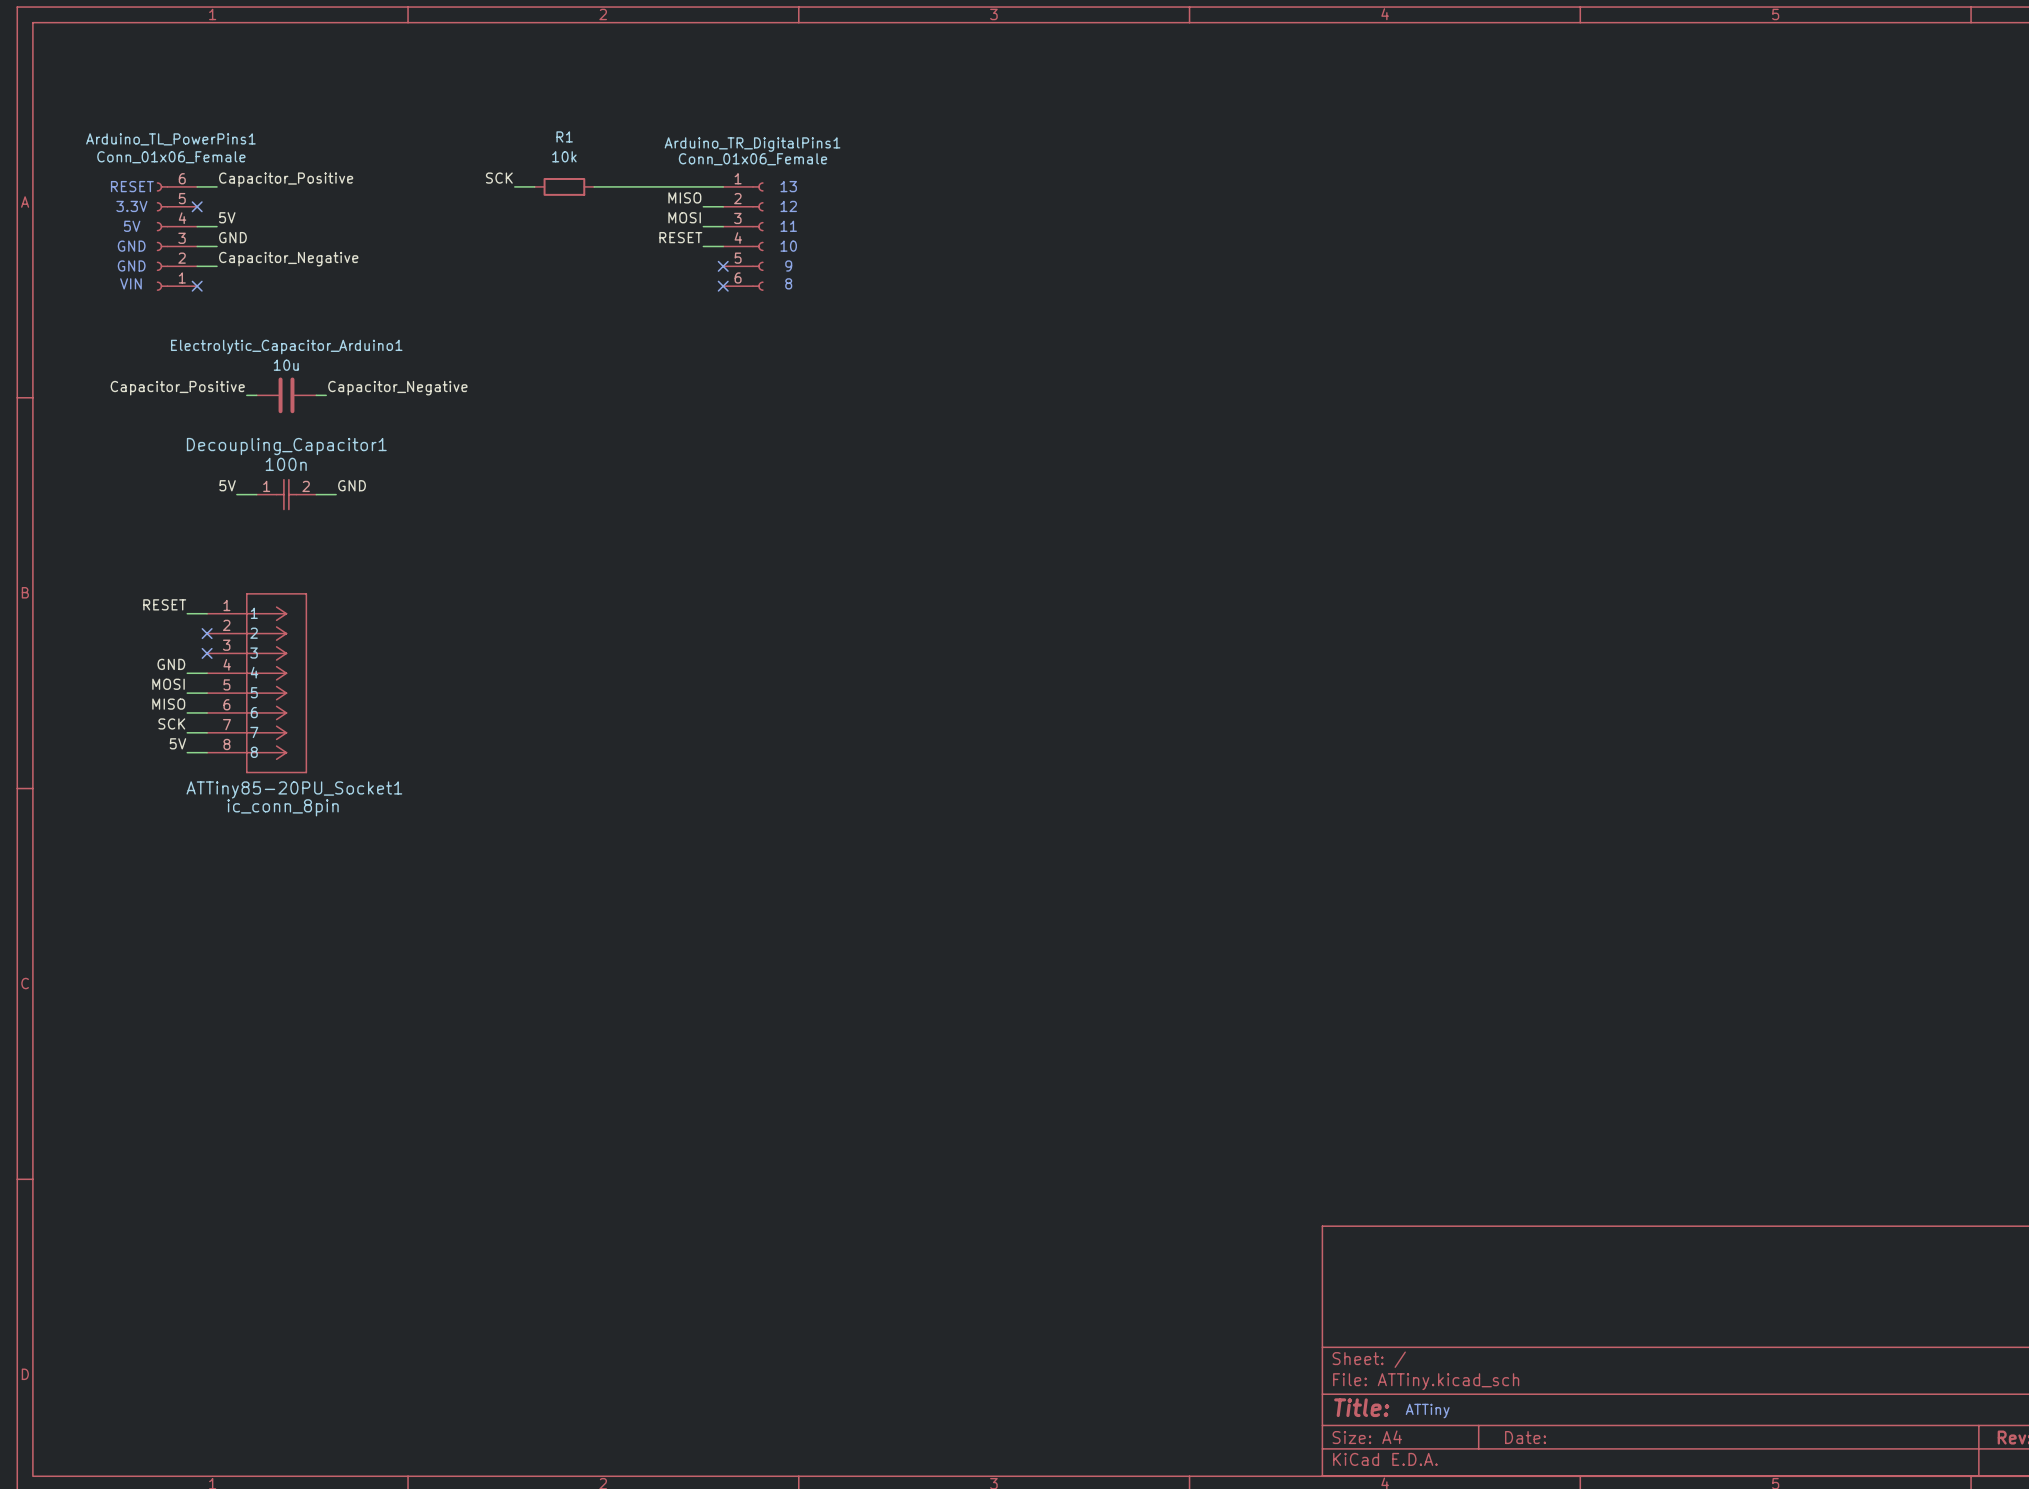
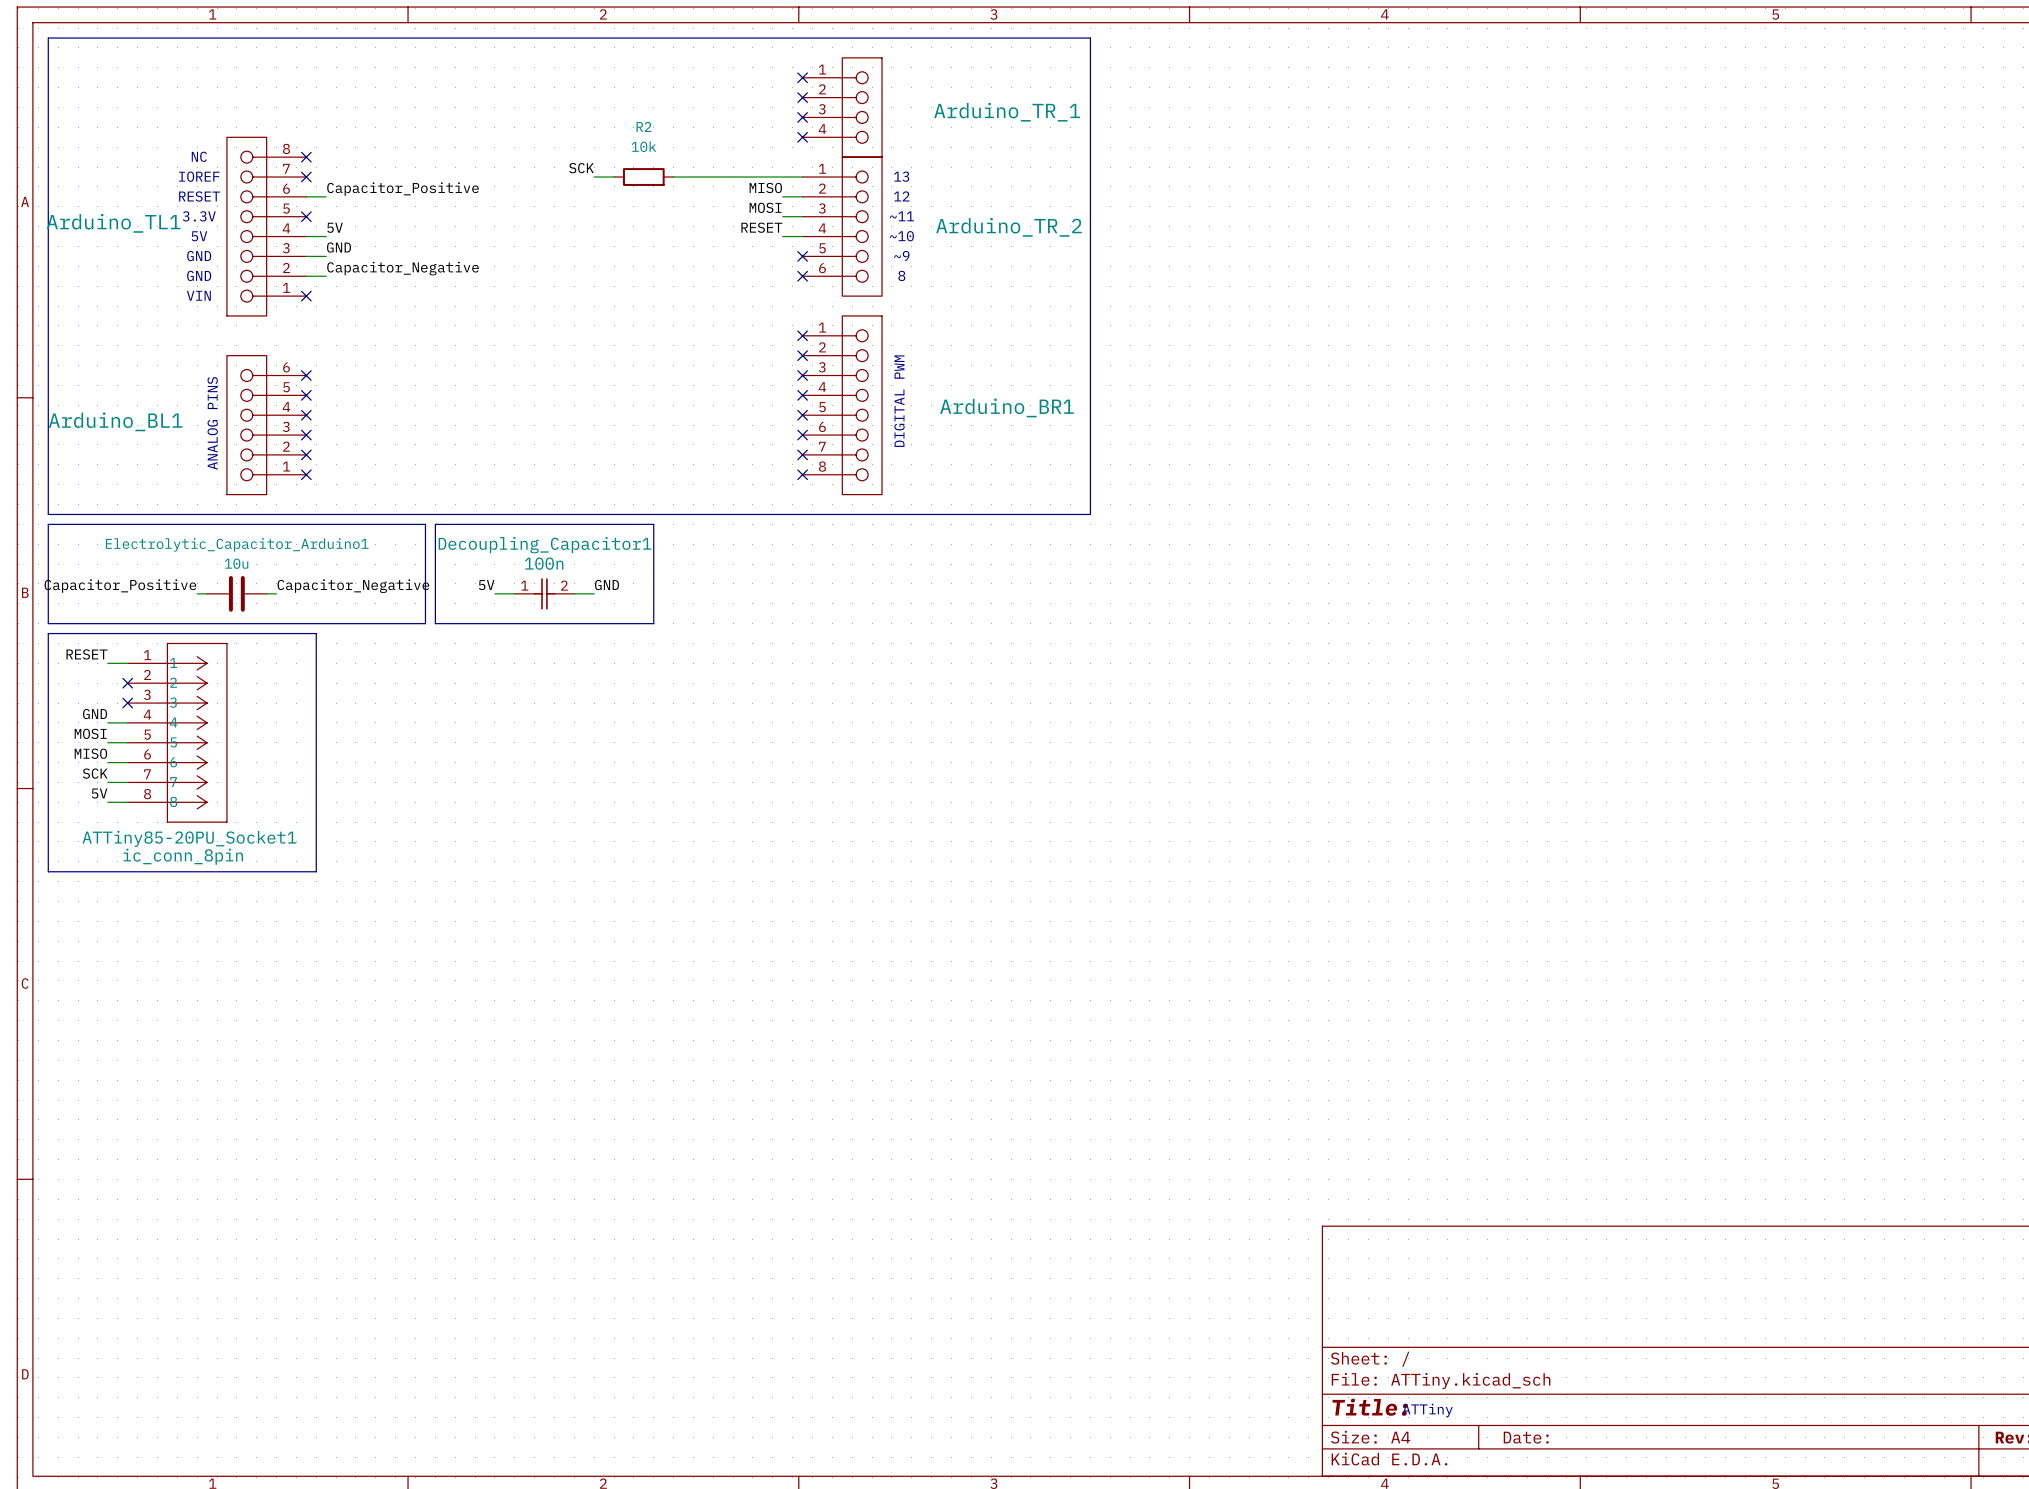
line: none -> (48, 38) (1090, 38) (1090, 514) (48, 514) (48, 38)
no-connect mark: none -> (802, 77)
no-connect mark: none -> (802, 97)
Arduino_TR_1: none -> (842, 107)
no-connect mark: none -> (802, 117)
no-connect mark: none -> (802, 137)
text: none -> NC (199, 156)
no-connect mark: none -> (306, 157)
text: none -> IOREF (199, 176)
no-connect mark: none -> (306, 177)
R2: none -> 10k (643, 177)
label position: SCK (499, 178) -> SCK (581, 168)
label position: Capacitor_Positive (286, 179) -> Capacitor_Positive (403, 189)
text position: RESET (132, 186) -> RESET (199, 196)
wire: (197, 186) (217, 186) -> (306, 196) (326, 196)
wire: (514, 186) (534, 186) -> (594, 177) (614, 177)
R1: 10k (564, 186) -> none
wire: (594, 186) (723, 186) -> (673, 177) (802, 177)
text position: 13 (788, 186) -> 13 (901, 176)
label position: MISO (684, 197) -> MISO (765, 188)
text position: 3.3V (131, 206) -> 3.3V (199, 216)
no-connect mark: (197, 206) -> none
wire: (703, 206) (723, 206) -> (782, 196) (802, 196)
text position: 12 (788, 206) -> 12 (901, 196)
no-connect mark: none -> (306, 216)
text: none -> ~11 (901, 216)
label position: 5V (227, 217) -> 5V (335, 227)
label position: MOSI (684, 217) -> MOSI (765, 207)
text position: 5V (132, 226) -> 5V (199, 236)
wire: (197, 226) (217, 226) -> (306, 236) (326, 236)
Arduino_TL1: none -> (266, 226)
wire: (703, 226) (723, 226) -> (782, 216) (802, 216)
text: 11 (788, 226) -> none
Arduino_TR_2: none -> (842, 226)
Arduino_TL_PowerPins1: Conn_01x06_Female (177, 236) -> none
Arduino_TR_DigitalPins1: Conn_01x06_Female (743, 236) -> none
text: none -> ~10 (901, 236)
label position: GND (232, 237) -> GND (339, 247)
label position: RESET (680, 237) -> RESET (761, 227)
text: GND (131, 246) -> none
wire: (197, 246) (217, 246) -> (306, 256) (326, 256)
wire: (703, 246) (723, 246) -> (782, 236) (802, 236)
text: 10 (788, 246) -> none
text: none -> GND (199, 256)
no-connect mark: none -> (802, 256)
text: none -> ~9 (901, 255)
label position: Capacitor_Negative (288, 259) -> Capacitor_Negative (403, 268)
text: GND (131, 265) -> none
text: 9 (788, 265) -> none
wire: (197, 266) (217, 266) -> (306, 276) (326, 276)
no-connect mark: (723, 266) -> none
text: none -> GND (199, 275)
no-connect mark: none -> (802, 276)
text position: VIN (130, 283) -> VIN (198, 295)
text position: 8 (788, 283) -> 8 (901, 275)
no-connect mark: (197, 286) -> none
no-connect mark: (723, 286) -> none
no-connect mark: none -> (306, 296)
no-connect mark: none -> (802, 335)
no-connect mark: none -> (802, 355)
no-connect mark: none -> (306, 375)
no-connect mark: none -> (802, 375)
label: Capacitor_Positive (177, 388) -> none
label: Capacitor_Negative (397, 388) -> none
wire: (246, 395) (256, 395) -> none
Electrolytic_Capacitor_Arduino1 position: (286, 395) -> (236, 593)
no-connect mark: none -> (306, 395)
wire: (316, 395) (326, 395) -> none
no-connect mark: none -> (802, 395)
text: none -> DIGITAL PWM (899, 401)
Arduino_BR1: none -> (842, 405)
no-connect mark: none -> (306, 415)
no-connect mark: none -> (802, 415)
text: none -> ANALOG PINS (212, 423)
Arduino_BL1: none -> (266, 425)
no-connect mark: none -> (306, 435)
no-connect mark: none -> (802, 435)
no-connect mark: none -> (306, 454)
no-connect mark: none -> (802, 454)
no-connect mark: none -> (306, 474)
no-connect mark: none -> (802, 474)
label: 5V (227, 485) -> none
label: GND (352, 485) -> none
Decoupling_Capacitor1 position: (286, 494) -> (544, 593)
wire: (316, 494) (336, 494) -> none
line: none -> (48, 524) (48, 623) (425, 623) (425, 524) (48, 524)
line: none -> (435, 524) (653, 524) (653, 623) (435, 623) (435, 524)
label: none -> 5V (486, 585)
label: none -> GND (606, 585)
label: none -> Capacitor_Positive (120, 586)
label: none -> Capacitor_Negative (353, 586)
wire: none -> (197, 593) (207, 593)
wire: none -> (494, 593) (514, 593)
wire: none -> (574, 593) (594, 593)
label position: RESET (164, 604) -> RESET (86, 654)
wire: (187, 613) (207, 613) -> (107, 663) (127, 663)
line: none -> (48, 633) (48, 871) (316, 871) (316, 633) (48, 633)
no-connect mark: (207, 633) -> none
no-connect mark: (207, 653) -> none
label position: GND (171, 664) -> GND (95, 714)
wire: (187, 673) (207, 673) -> (107, 722) (127, 722)
no-connect mark: none -> (127, 683)
ATTiny85-20PU_Socket1 position: (256, 683) -> (177, 732)
label position: MOSI (168, 684) -> MOSI (90, 733)
wire: (187, 693) (207, 693) -> (107, 742) (127, 742)
no-connect mark: none -> (127, 703)
label position: MISO (168, 704) -> MISO (90, 753)
wire: (187, 712) (207, 712) -> (107, 762) (127, 762)
label position: SCK (171, 723) -> SCK (95, 773)
wire: (187, 732) (207, 732) -> (107, 782) (127, 782)
label position: 5V (177, 743) -> 5V (99, 793)
wire: (187, 752) (207, 752) -> (107, 802) (127, 802)
ATTiny85-20PU_Socket1 name position: ATTiny85-20PU_Socket1 (294, 789) -> ATTiny85-20PU_Socket1 (189, 838)
ATTiny85-20PU_Socket1 value position: ic_conn_8pin (283, 807) -> ic_conn_8pin (183, 856)

